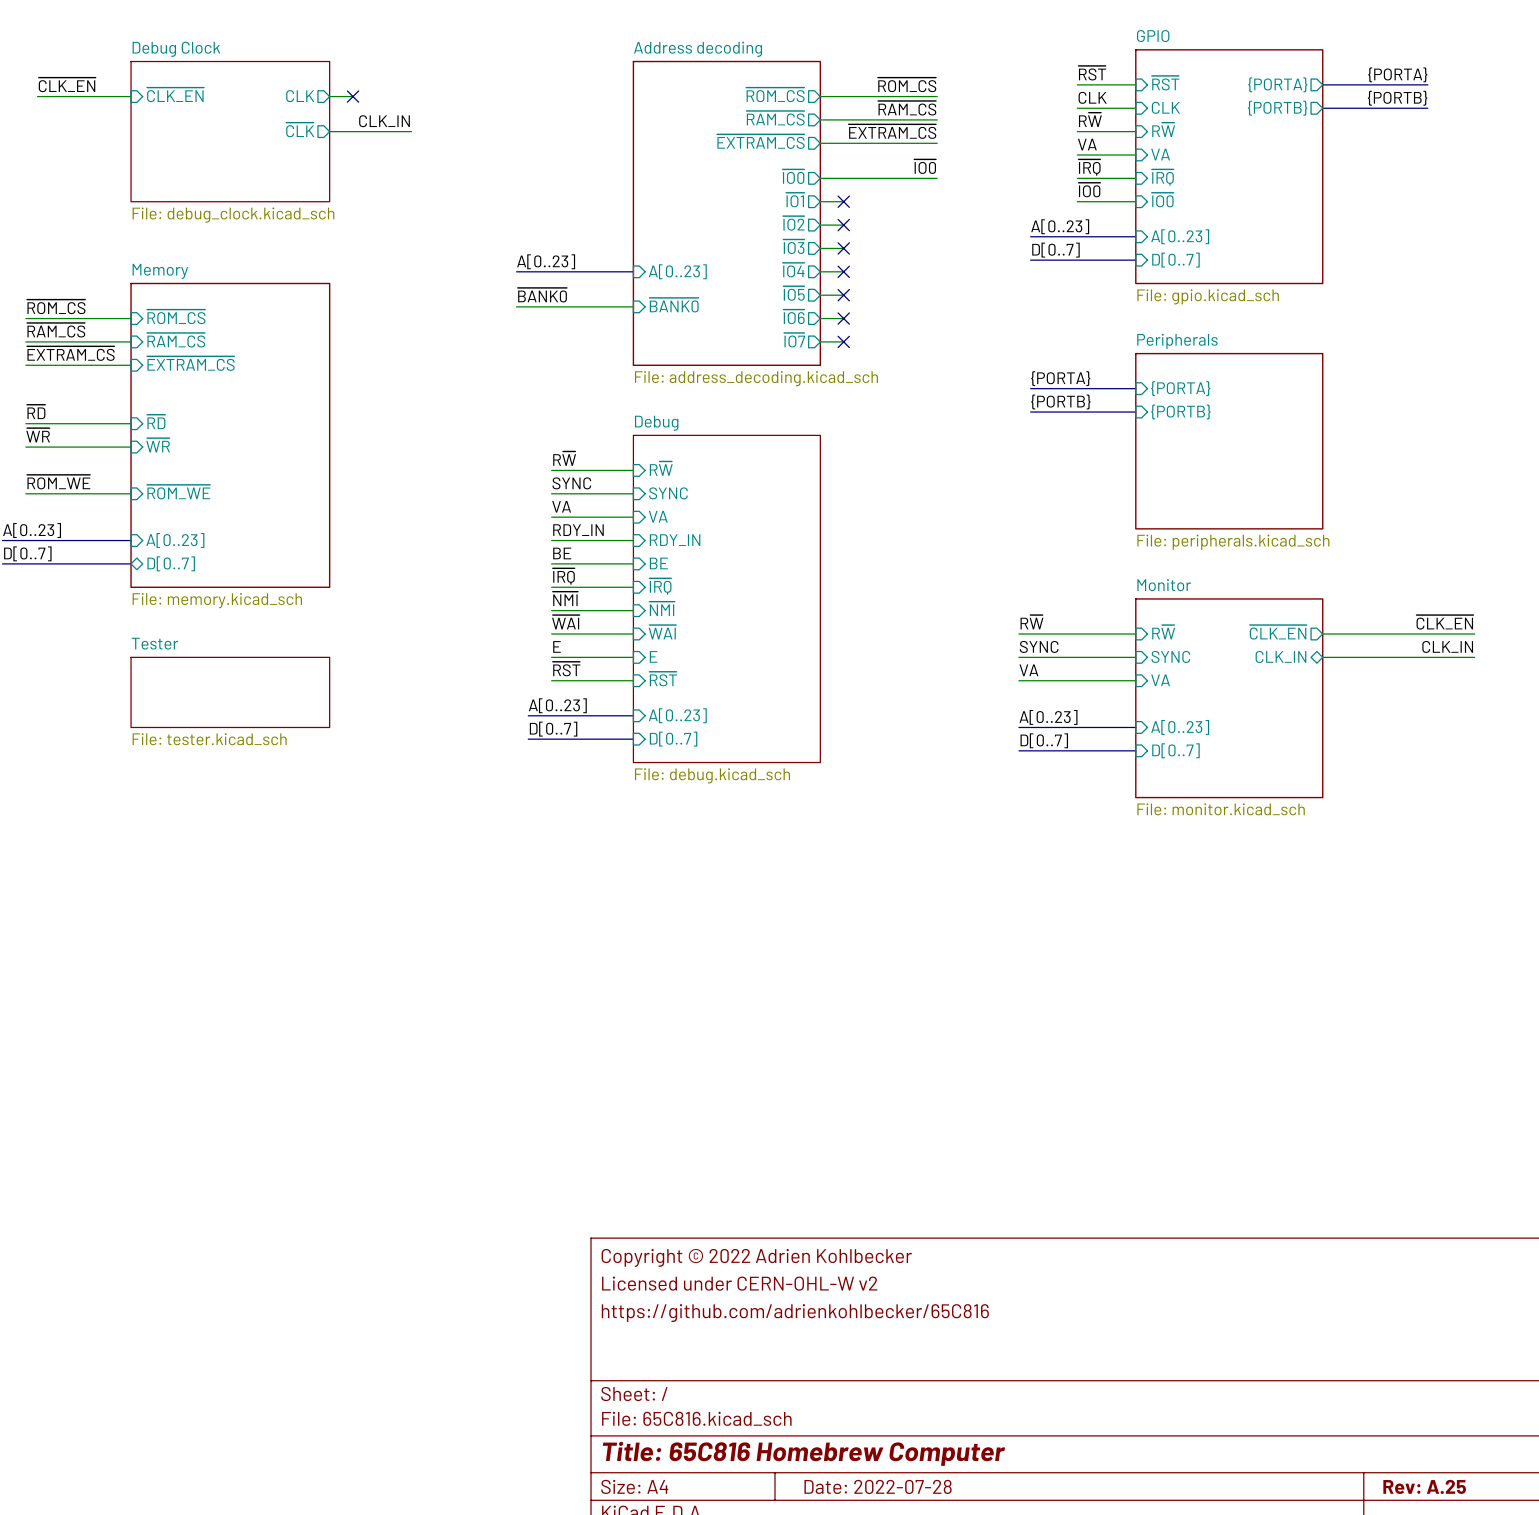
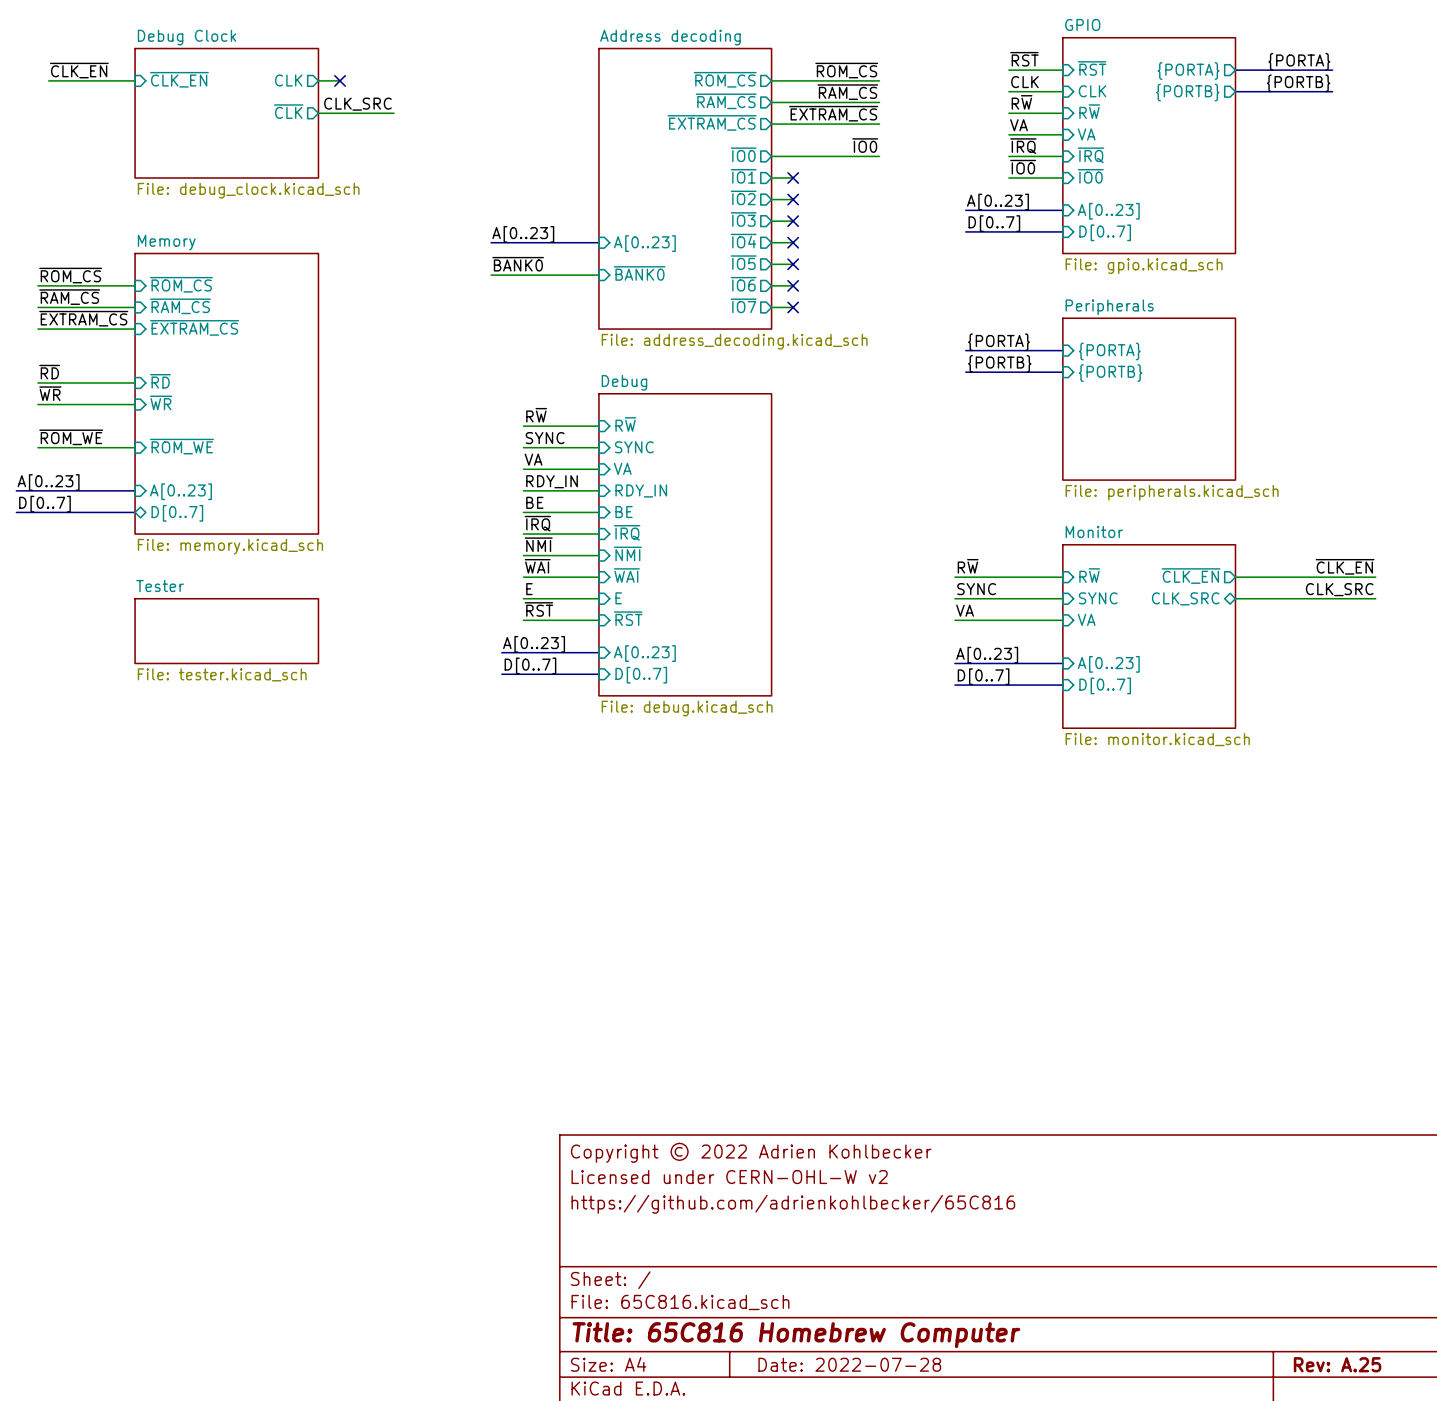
label: CLK_IN (384, 121) -> CLK_SRC (357, 104)
label: CLK_IN (1447, 646) -> CLK_SRC (1339, 589)
sheet pin: CLK_IN (1280, 656) -> CLK_SRC (1185, 598)

